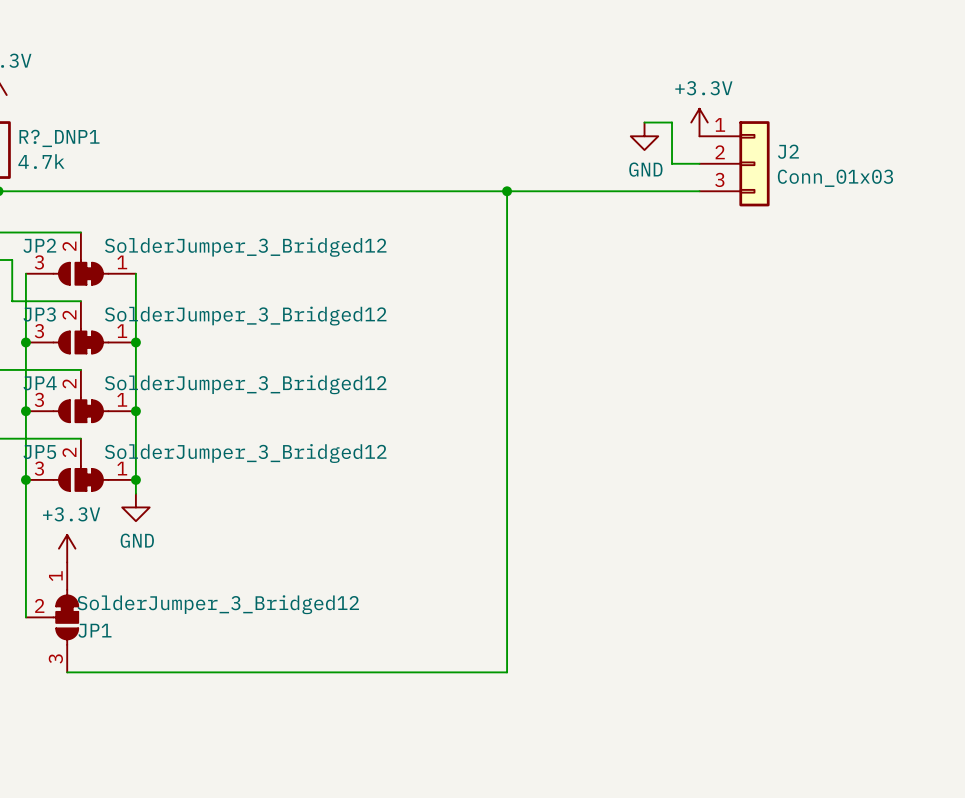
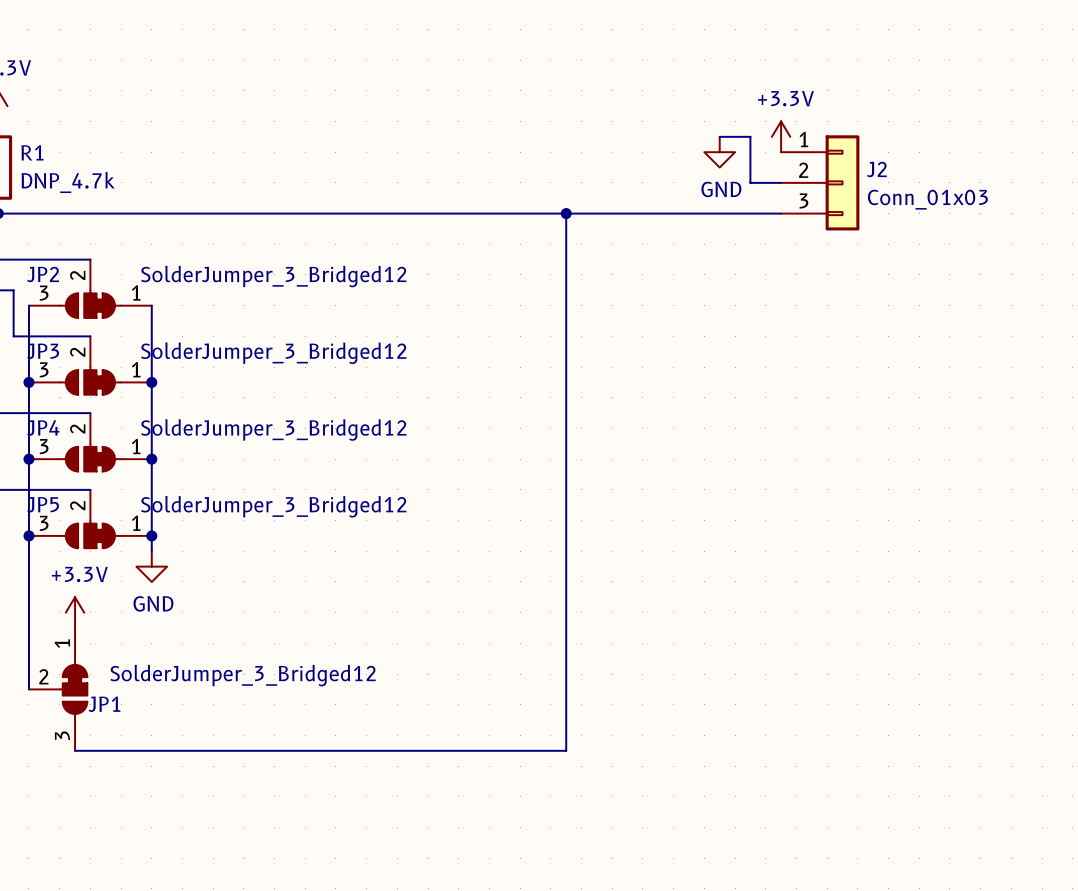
R?_DNP1 name: R?_DNP1 (59, 138) -> R1 (32, 152)
R?_DNP1 value: 4.7k (41, 161) -> DNP_4.7k (68, 182)

